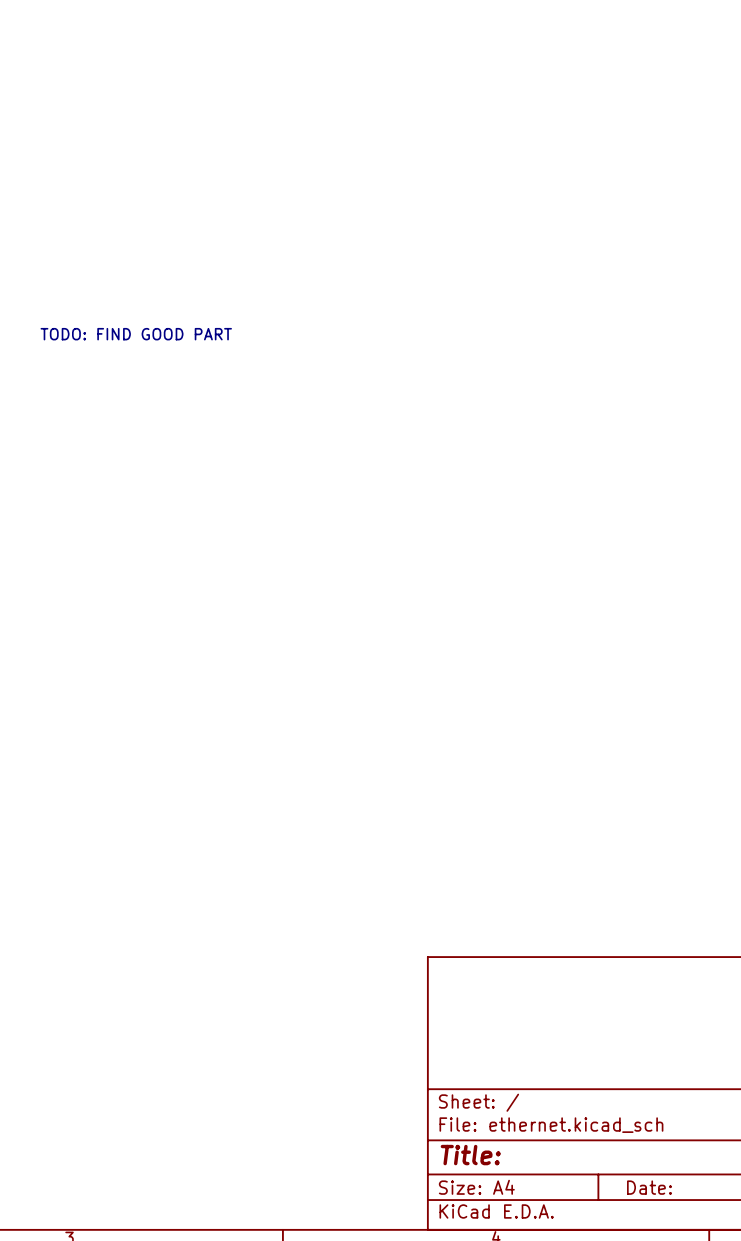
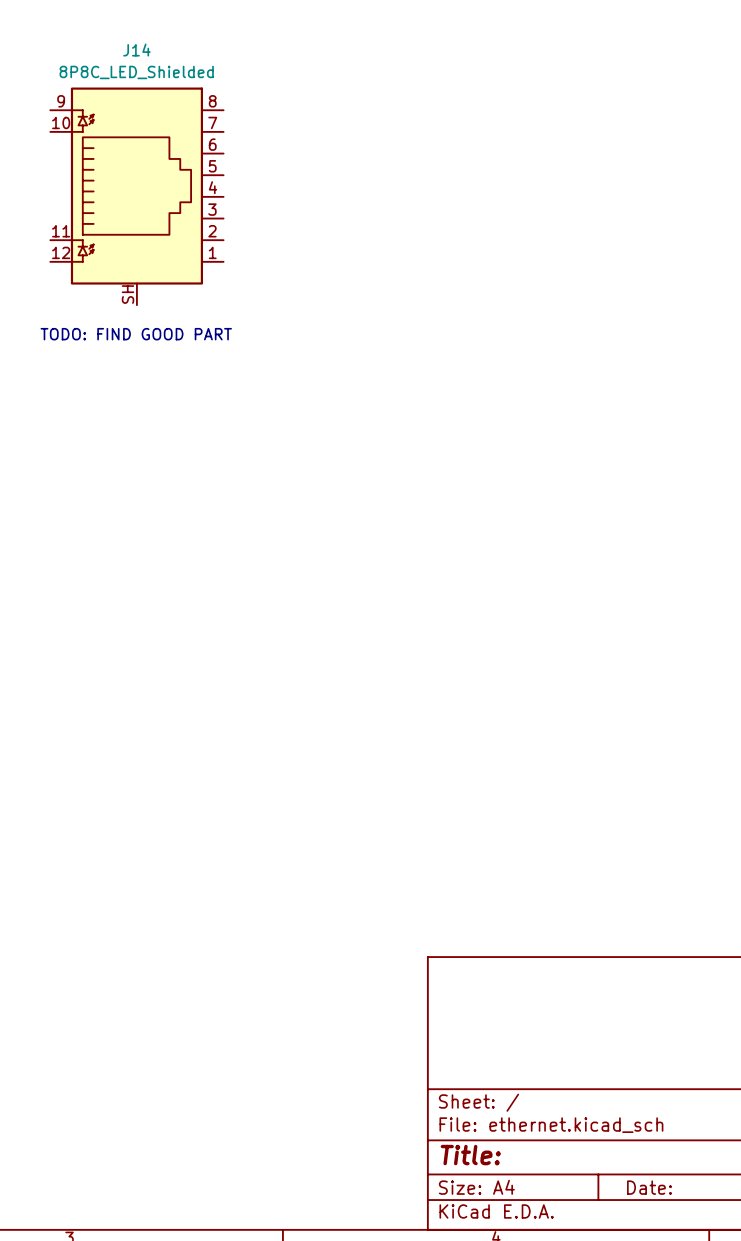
J14: none -> 8P8C_LED_Shielded (136, 196)

